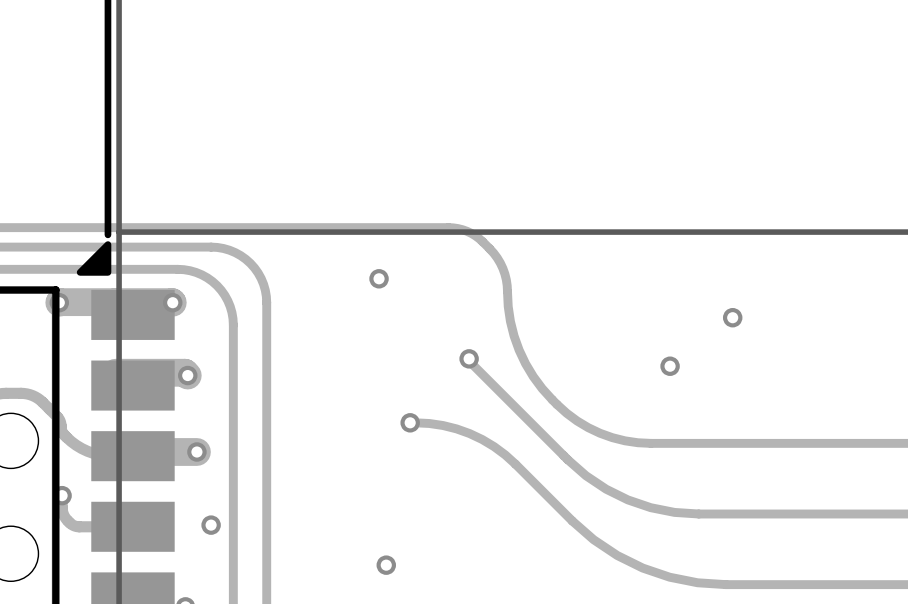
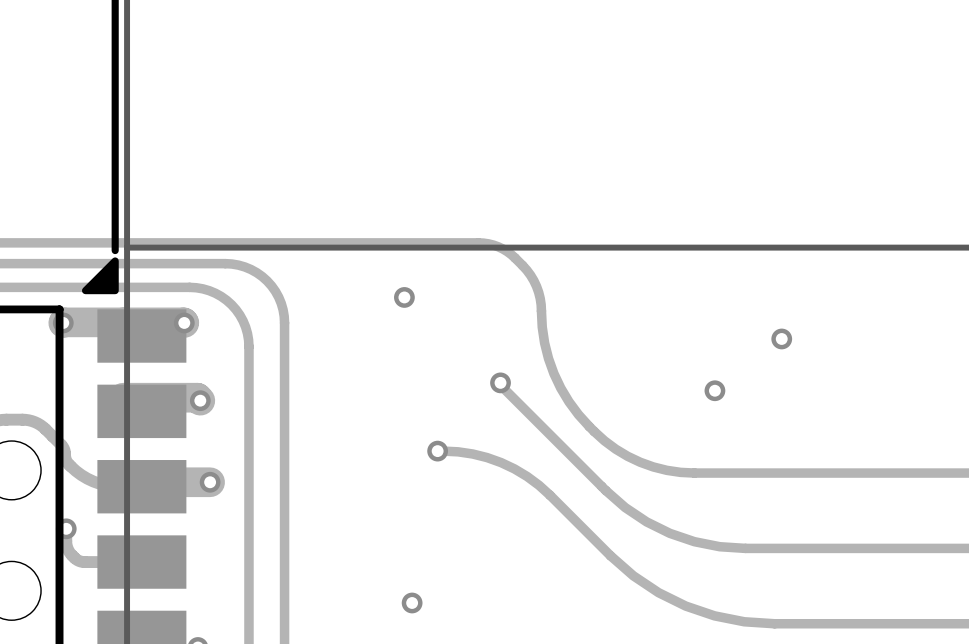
via: (211, 525) -> none

